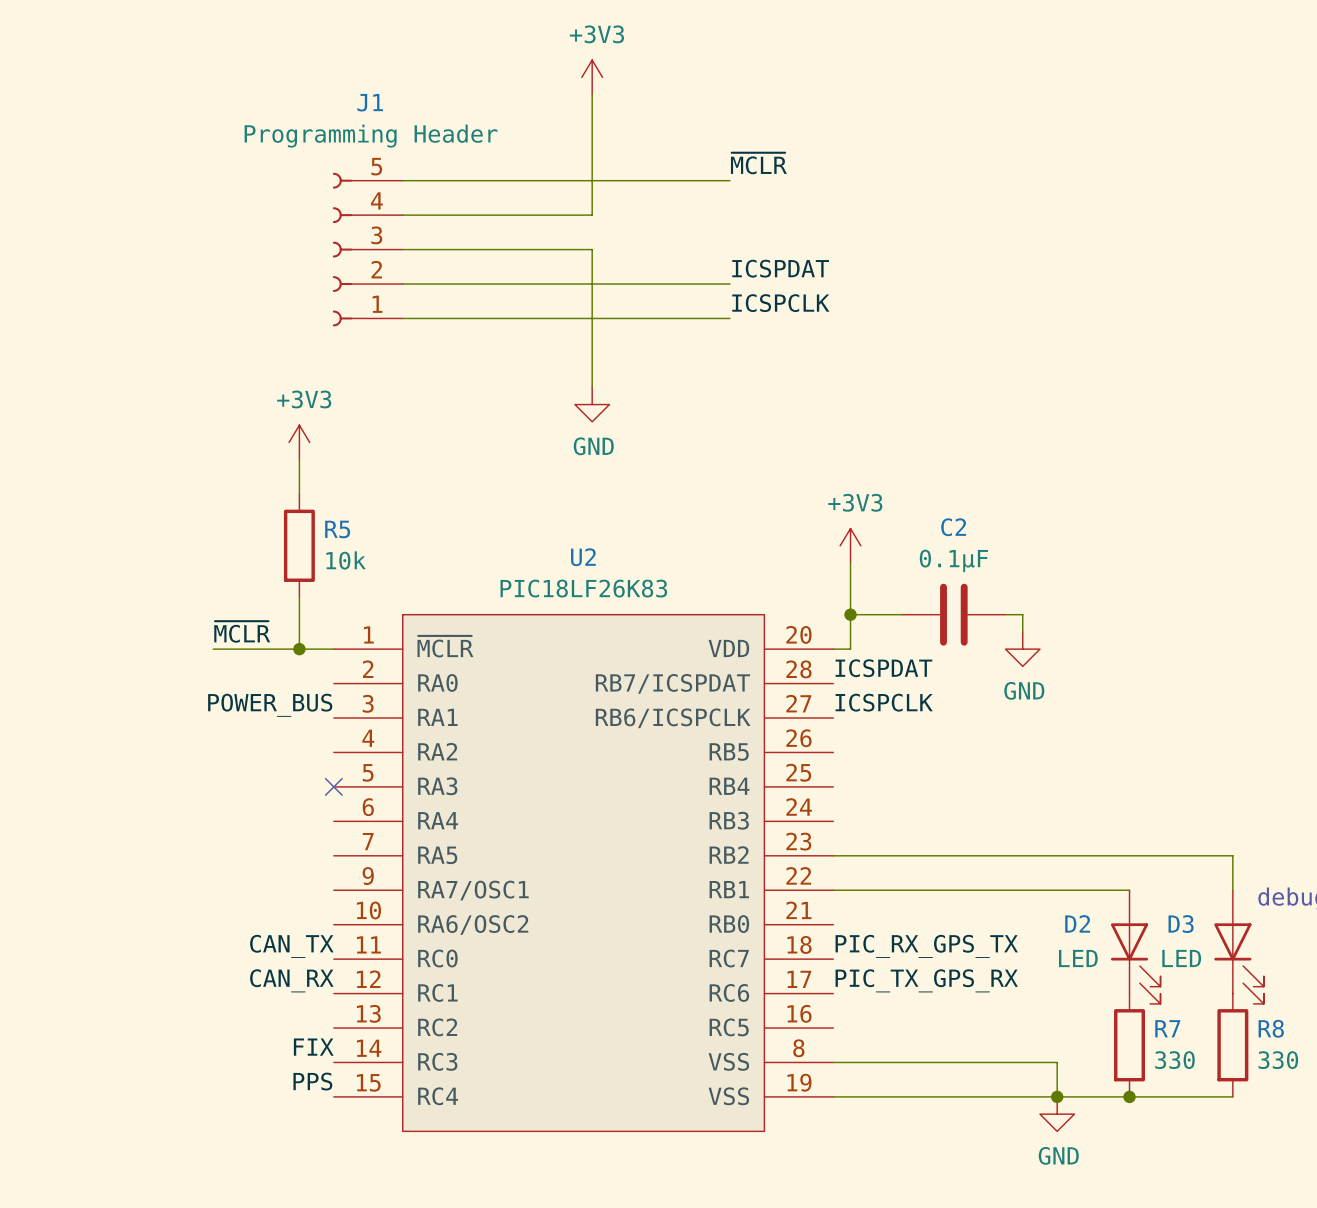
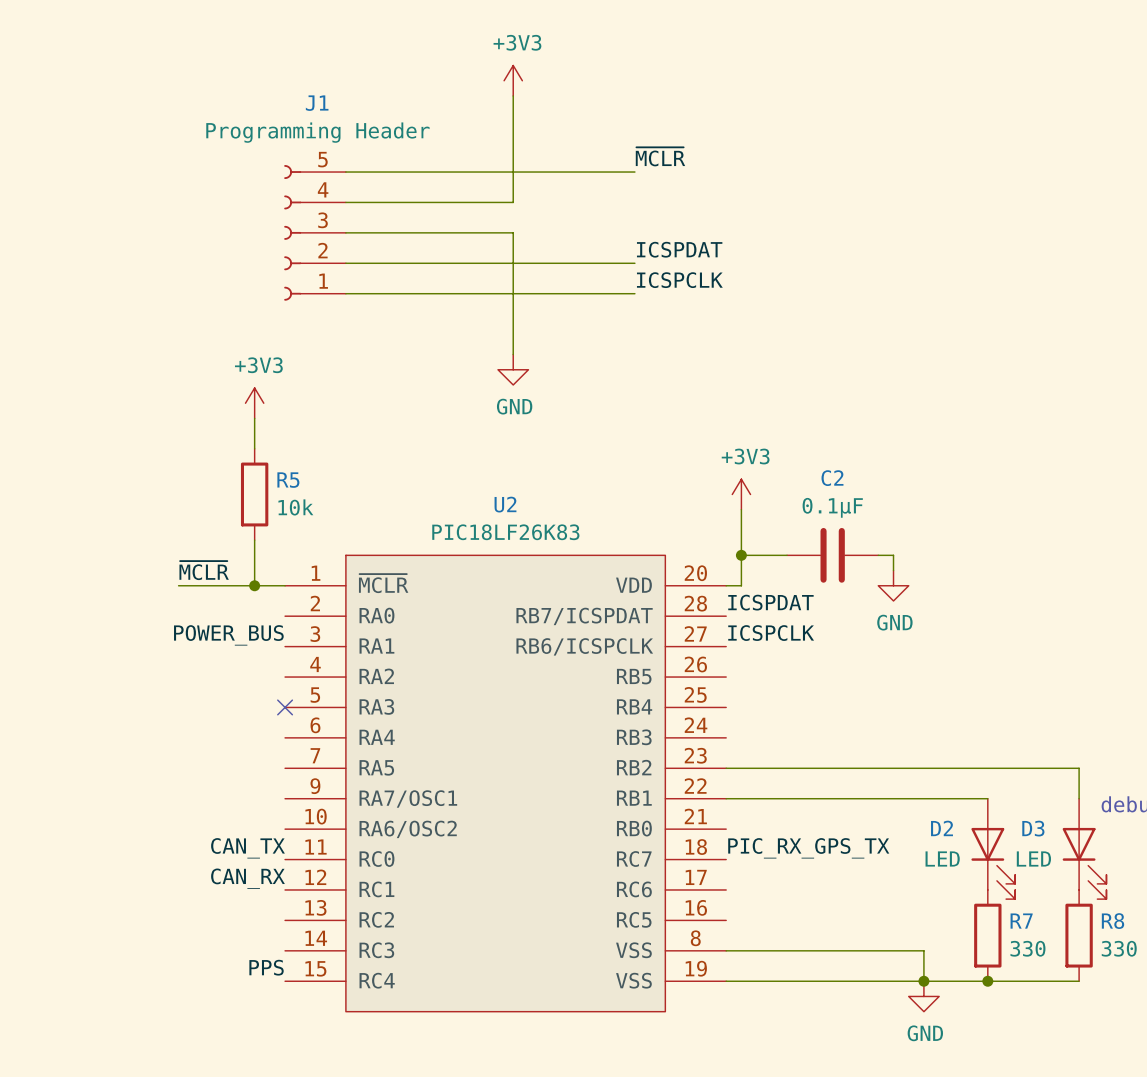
label: PIC_TX_GPS_RX (926, 980) -> none
label: FIX (313, 1047) -> none

